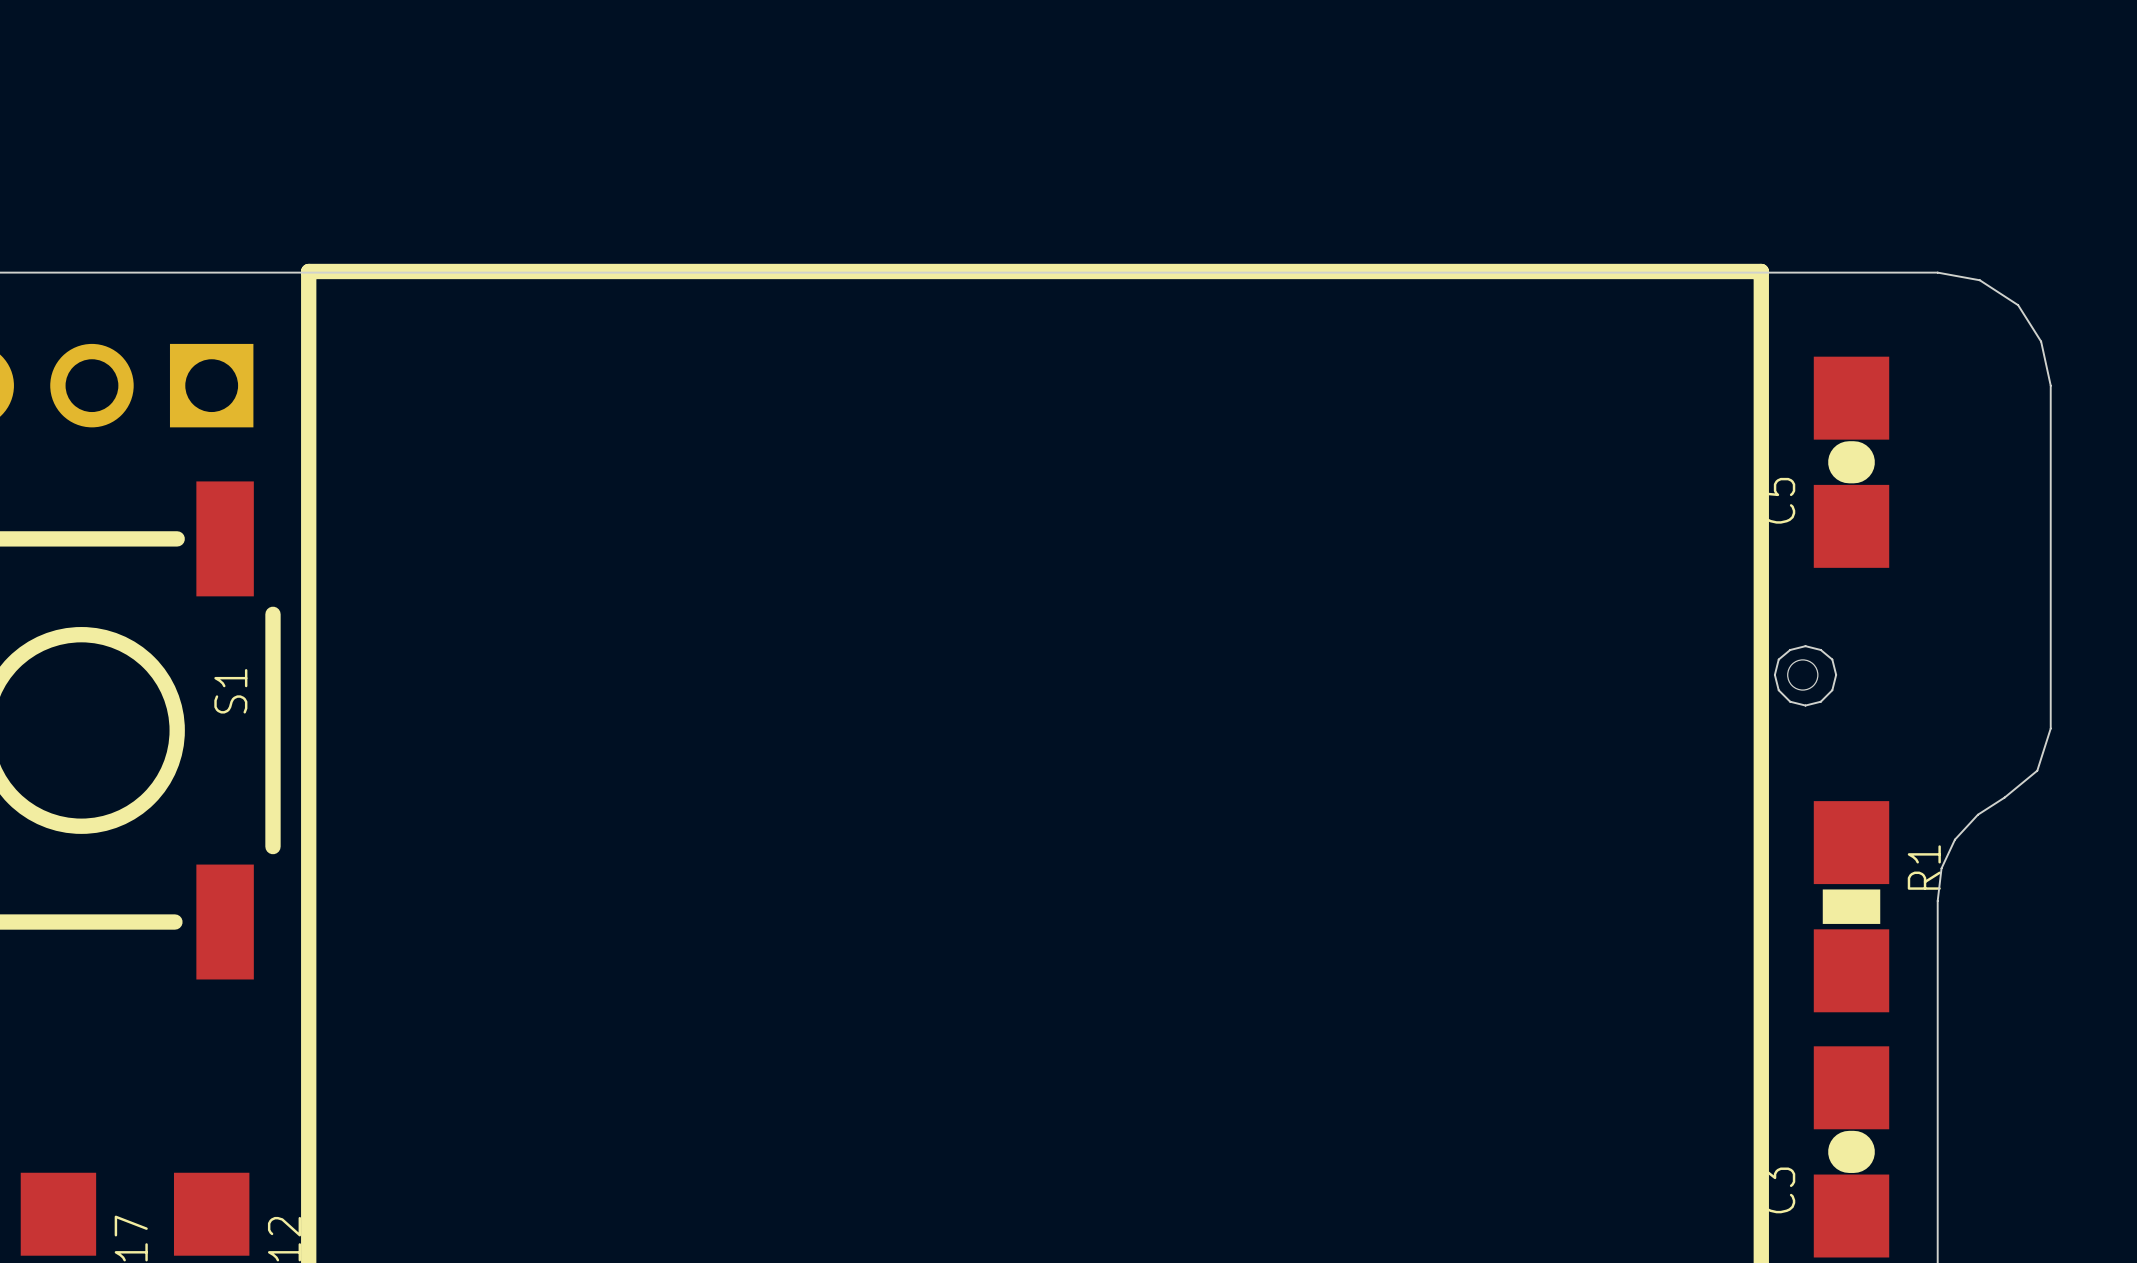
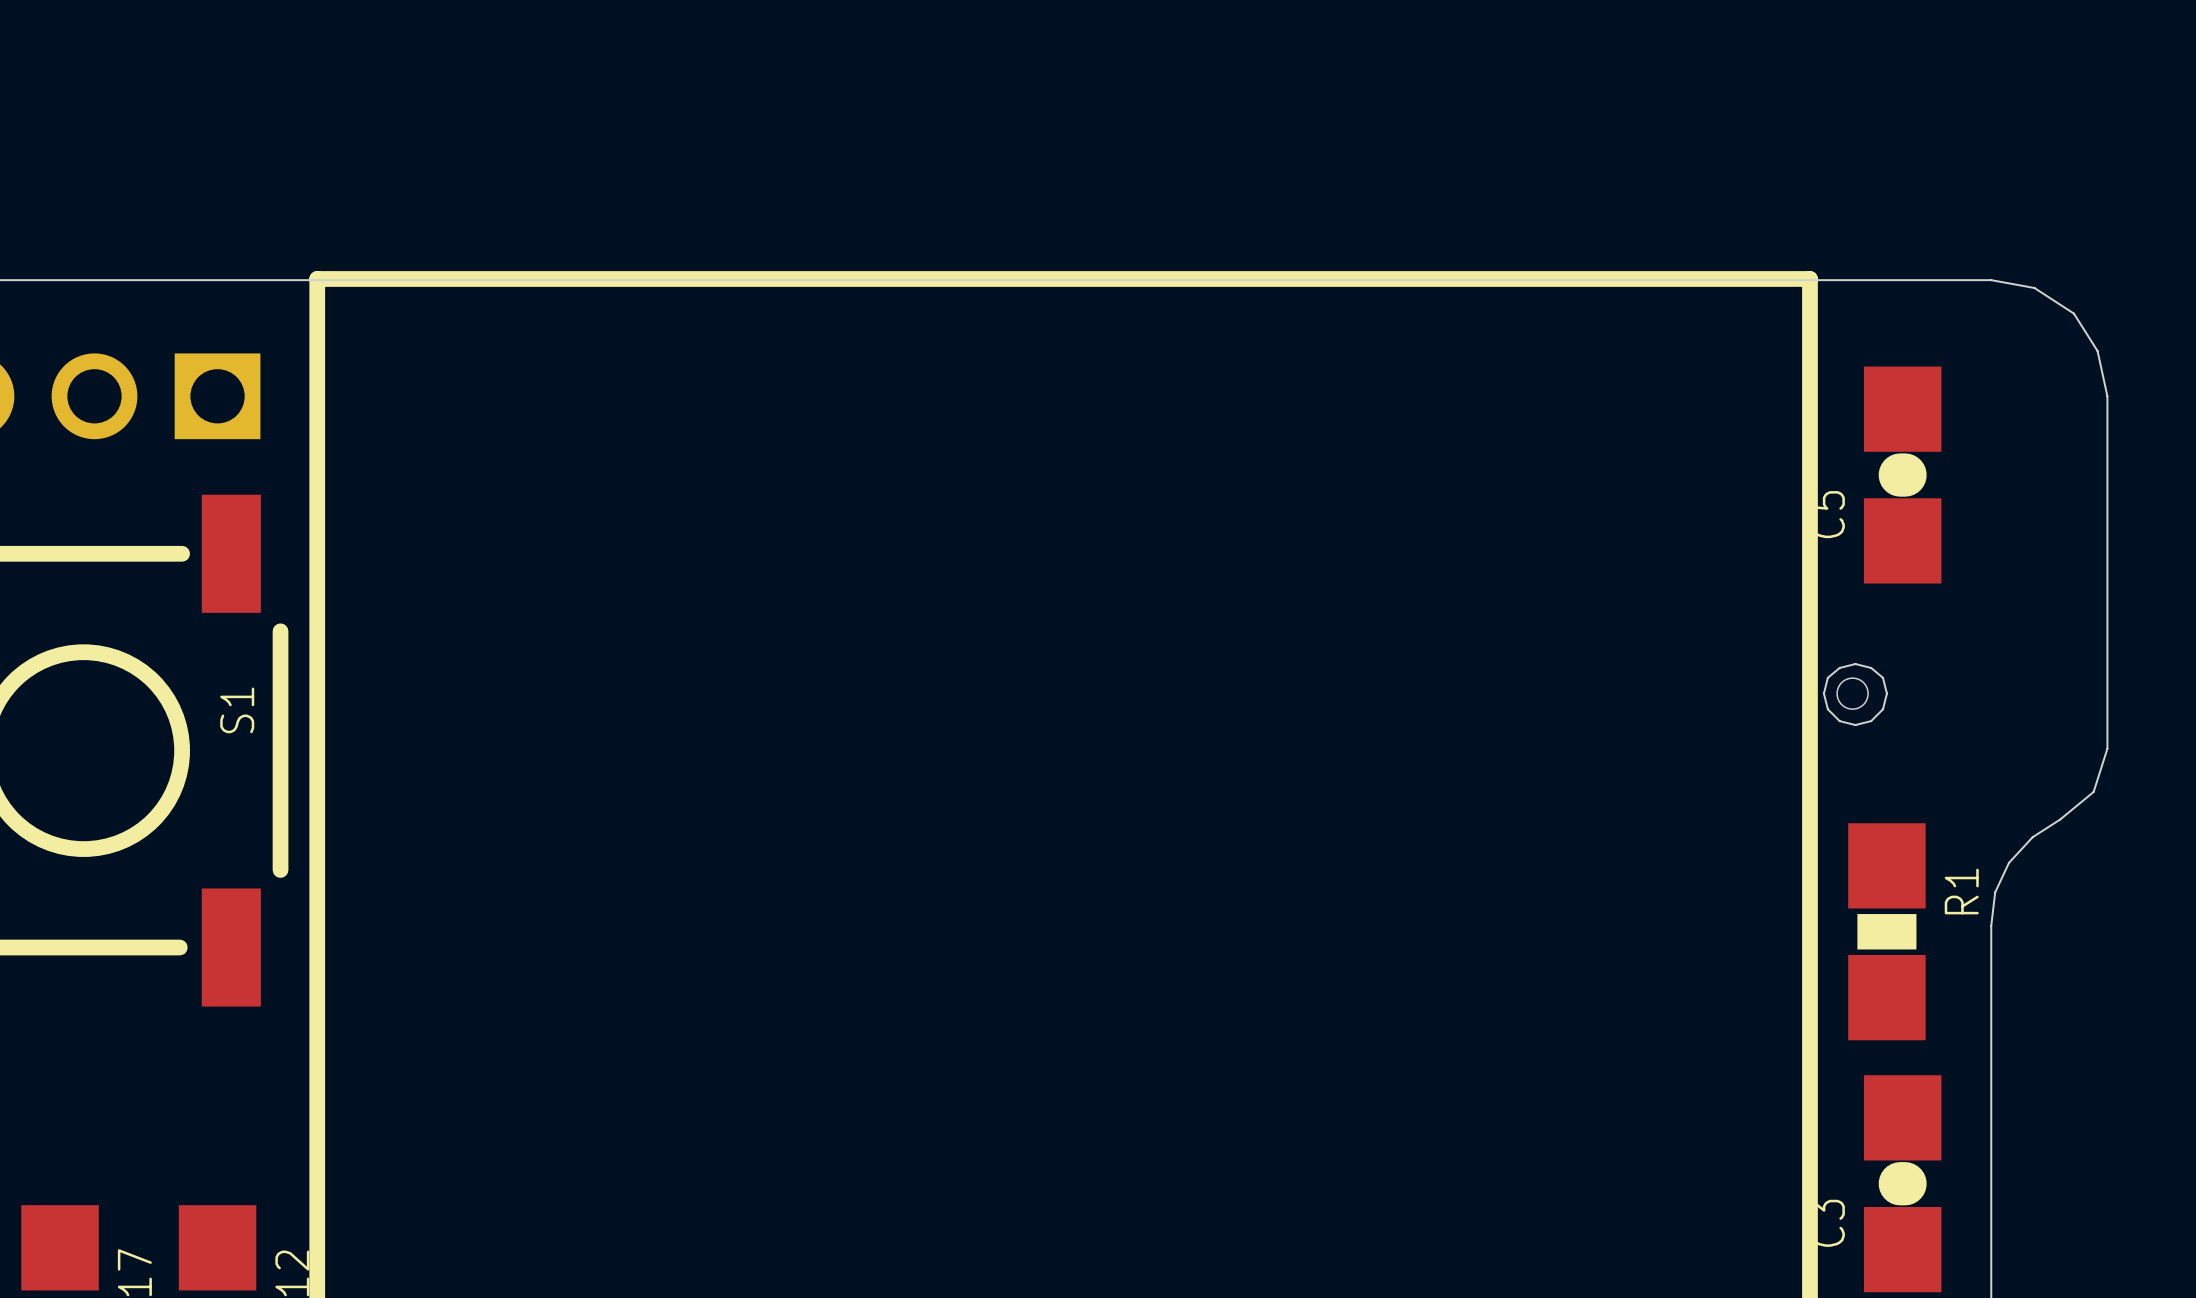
R1 position: (1851, 906) -> (1886, 931)

